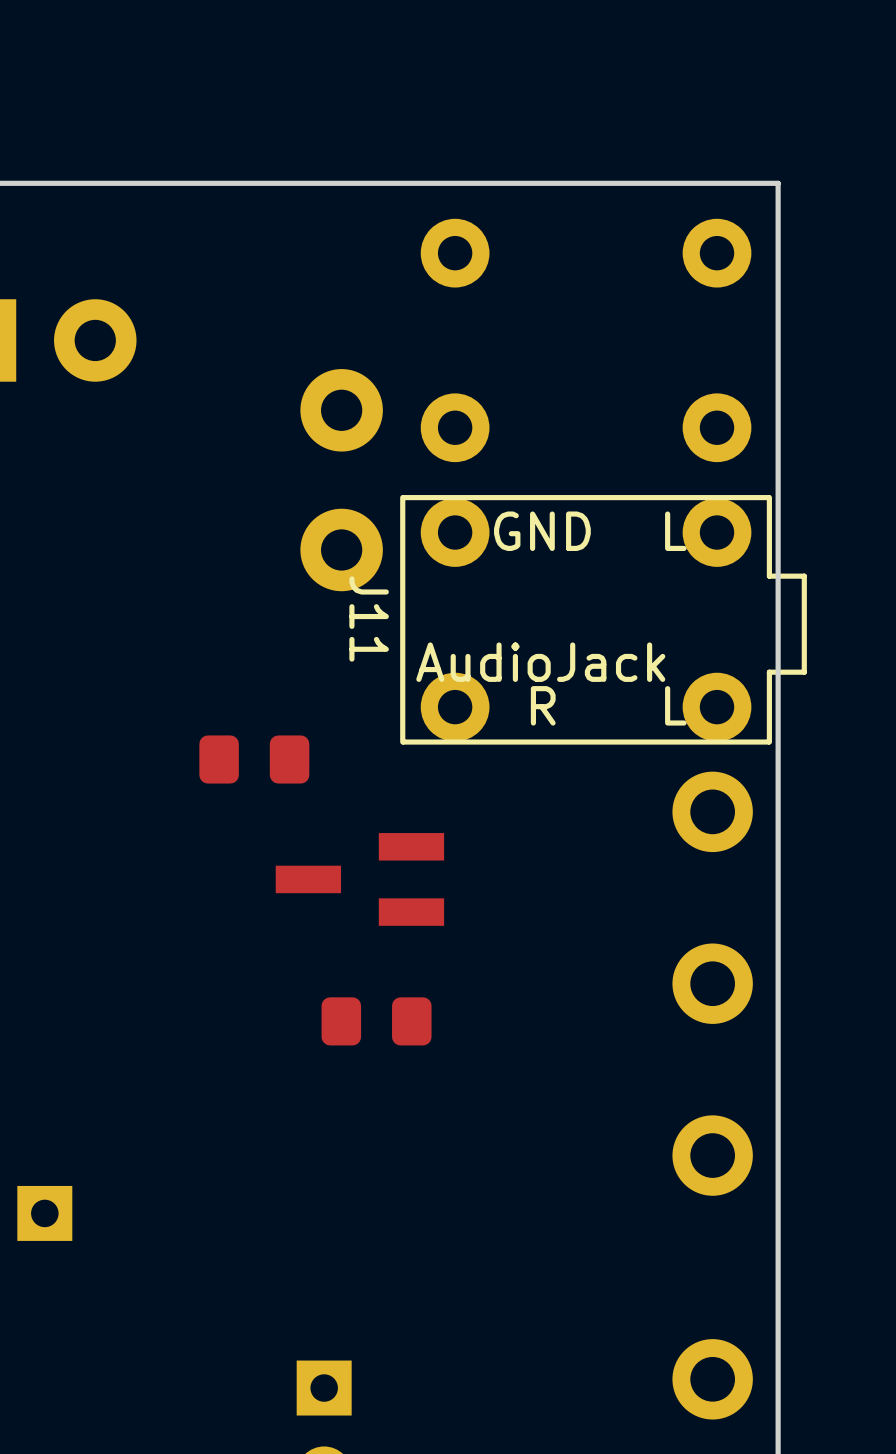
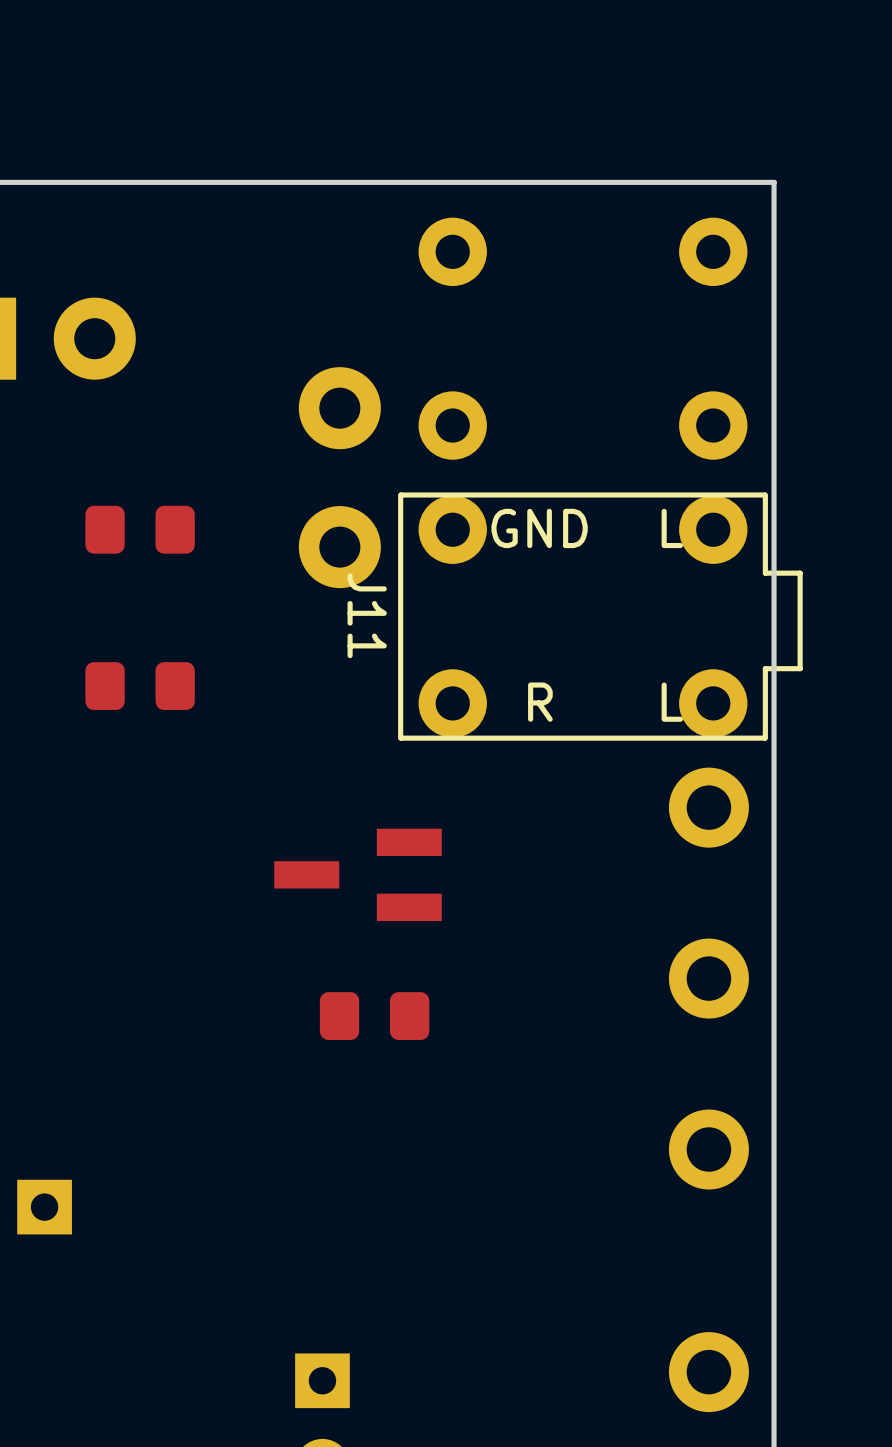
part: none -> (140, 529)
J11 value: AudioJack (540, 662) -> none
part: none -> (140, 686)
part: (254, 759) -> none

